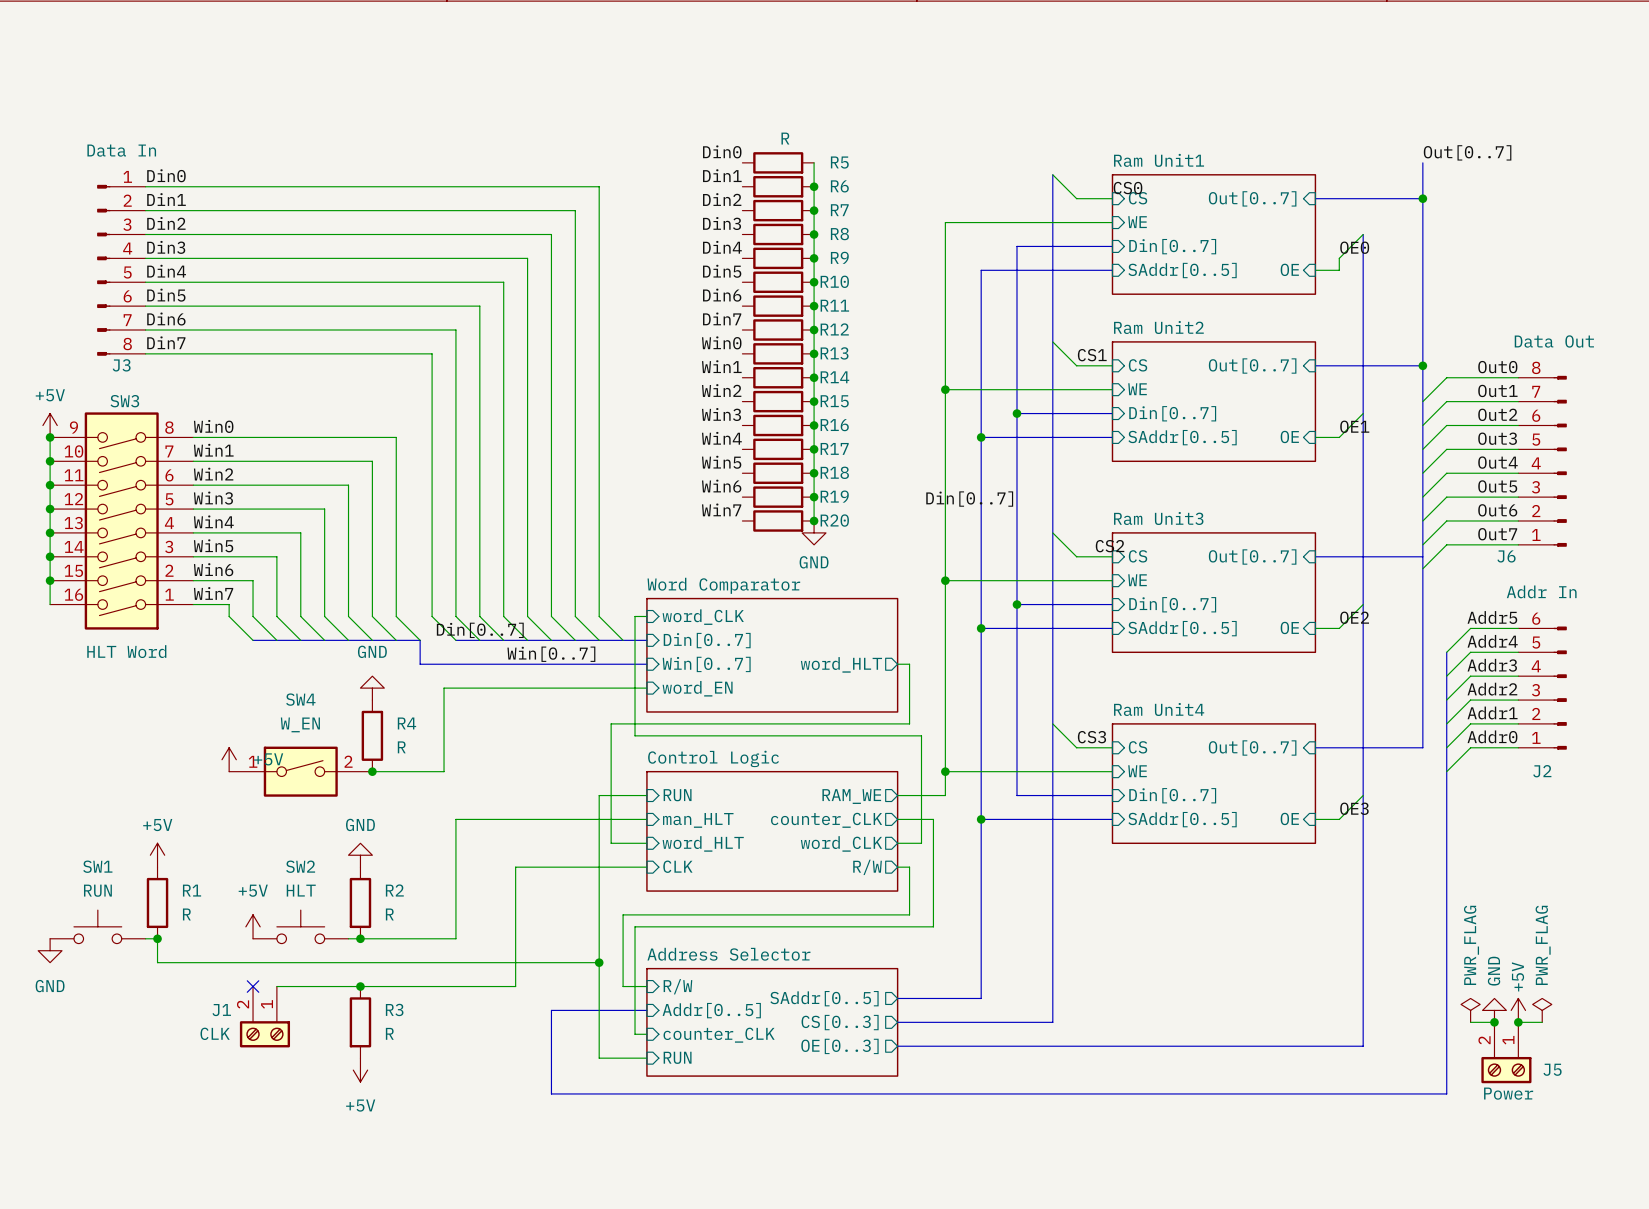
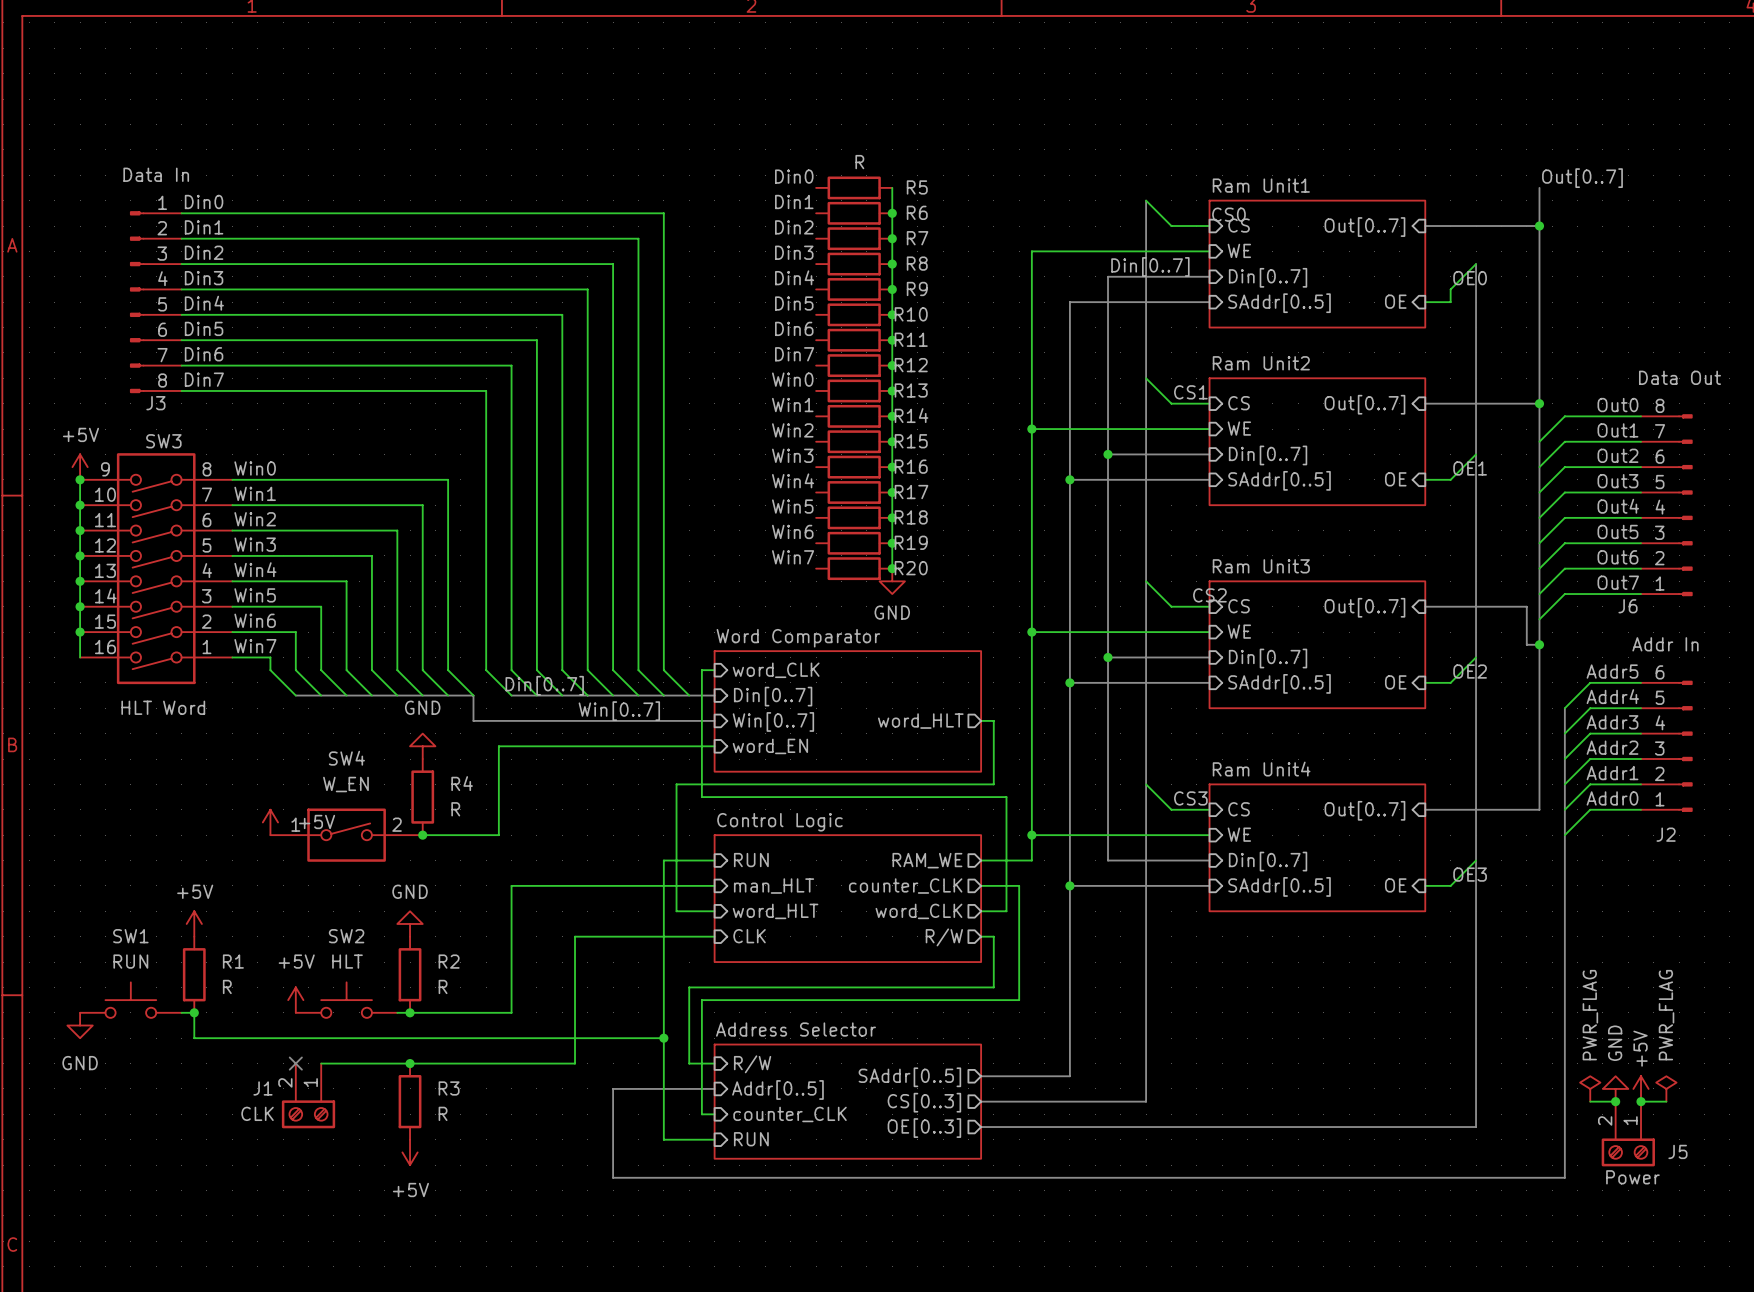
label: none -> Din[0..7] (1150, 266)
label: Din[0..7] (969, 499) -> none
bus: (1410, 556) (1422, 556) -> (1526, 606) (1526, 644) (1539, 644)
junction: none -> (1539, 644)

